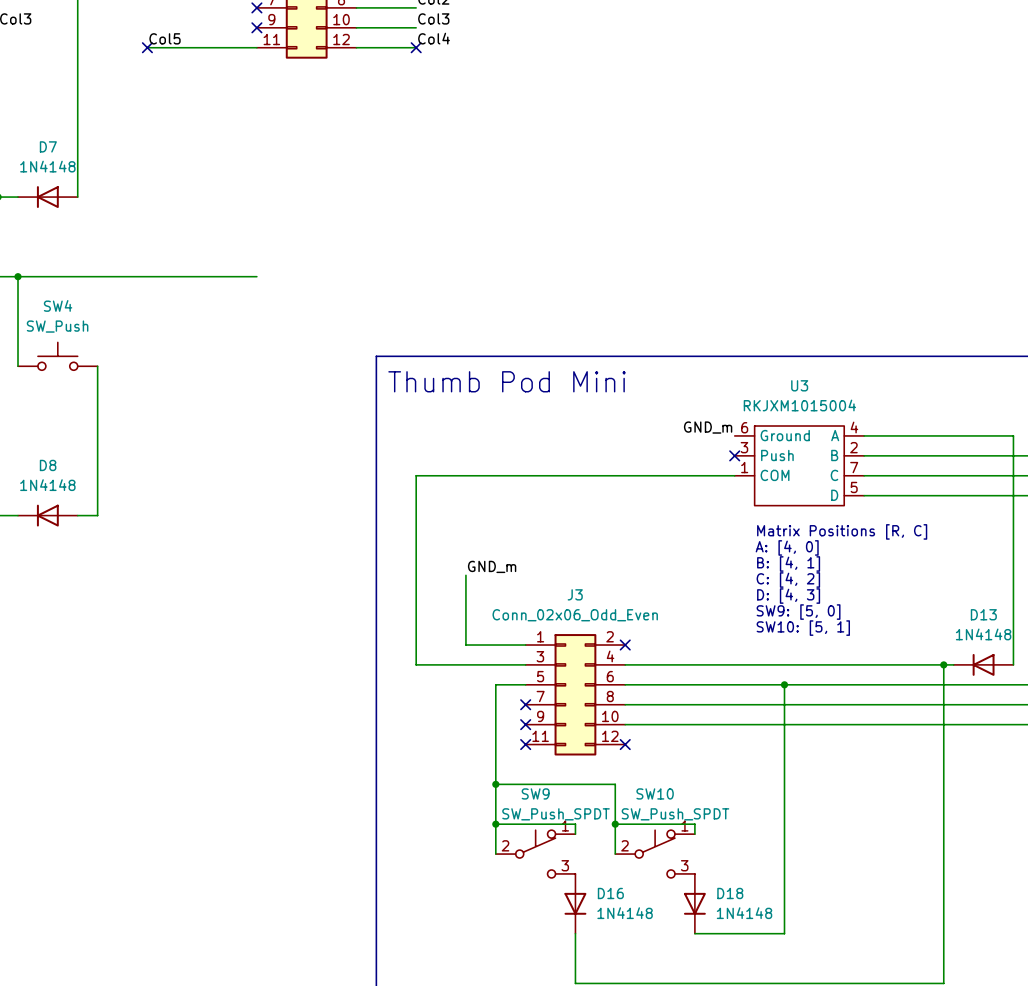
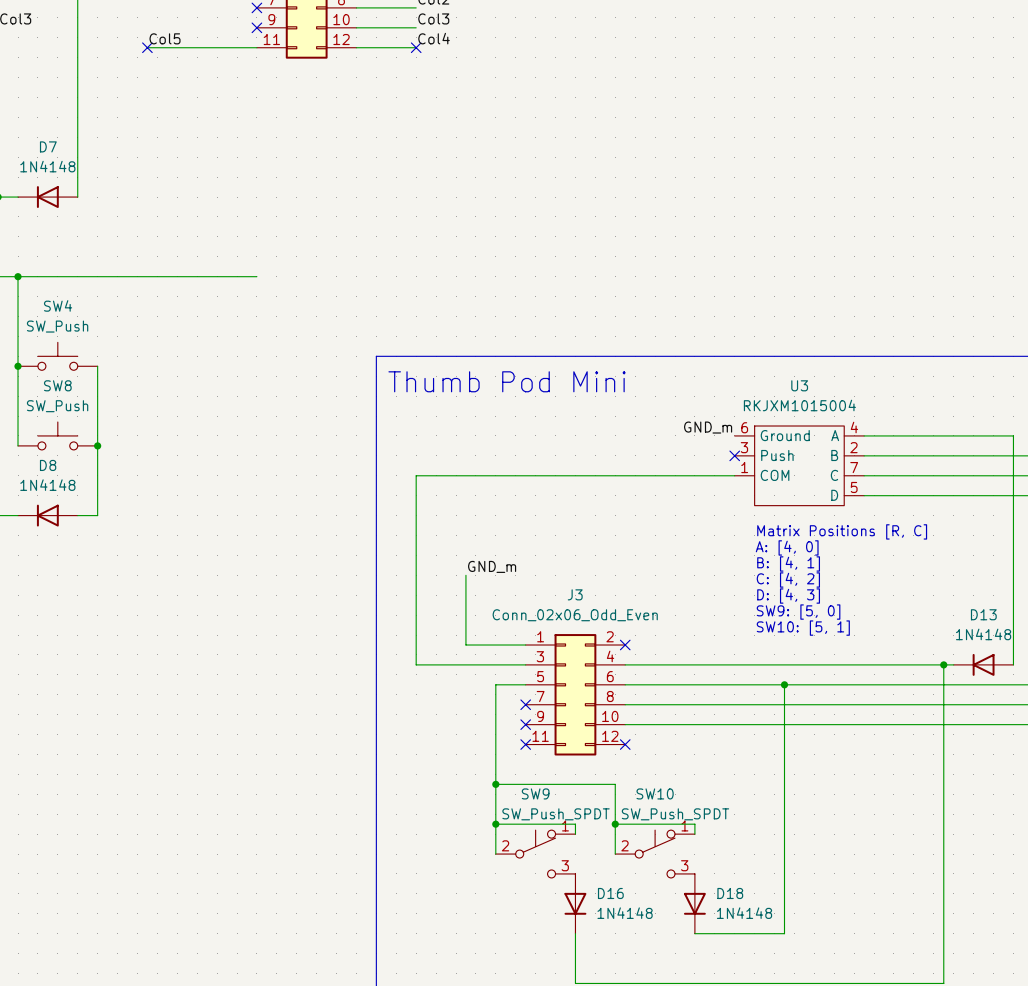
wire: none -> (18, 366) (18, 445)
junction: none -> (18, 366)
SW8: none -> SW_Push (57, 435)
junction: none -> (97, 445)

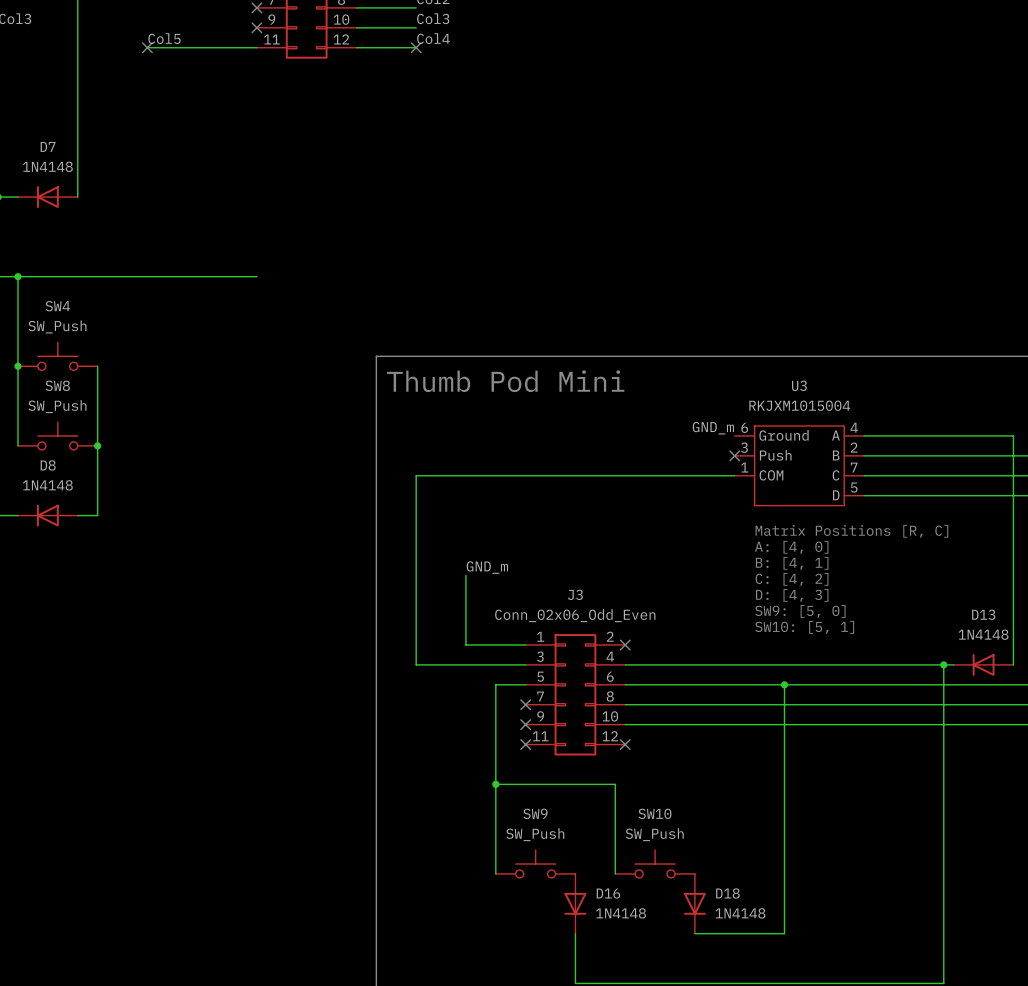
SW9 value: SW_Push_SPDT (556, 814) -> SW_Push (535, 834)
SW10 value: SW_Push_SPDT (675, 814) -> SW_Push (654, 834)
wire: (495, 824) (575, 824) (575, 834) -> none
junction: (495, 824) -> none
wire: (615, 824) (694, 824) (694, 834) -> none
junction: (615, 824) -> none
SW9 symbol: [495, 830, 576, 878] -> [495, 850, 576, 878]
SW10 symbol: [615, 830, 695, 878] -> [615, 850, 695, 878]
wire: none -> (495, 854) (495, 873)
wire: none -> (615, 854) (615, 873)

